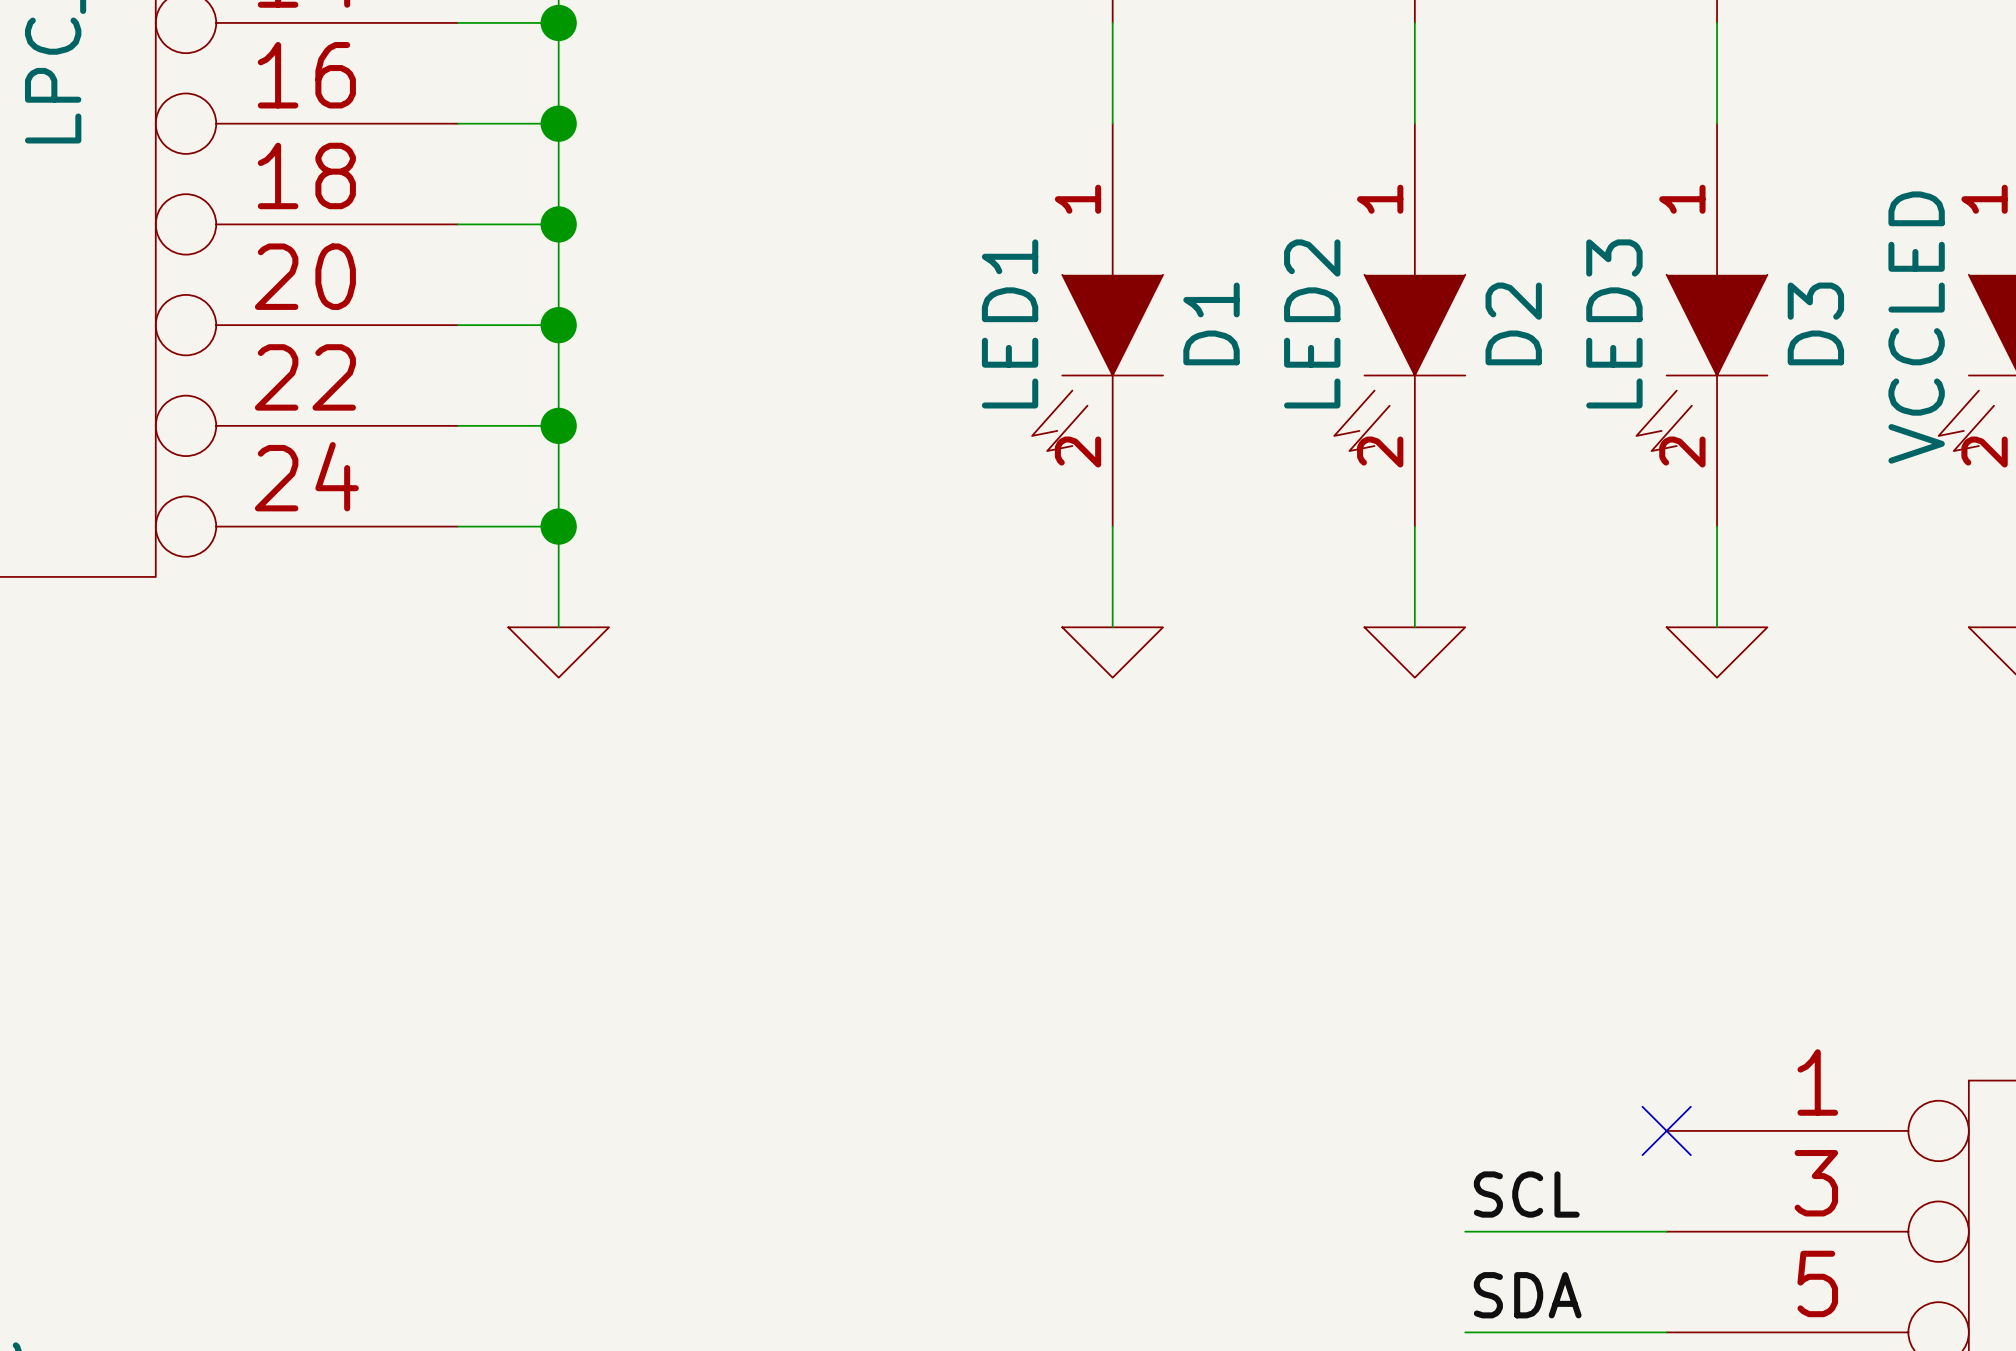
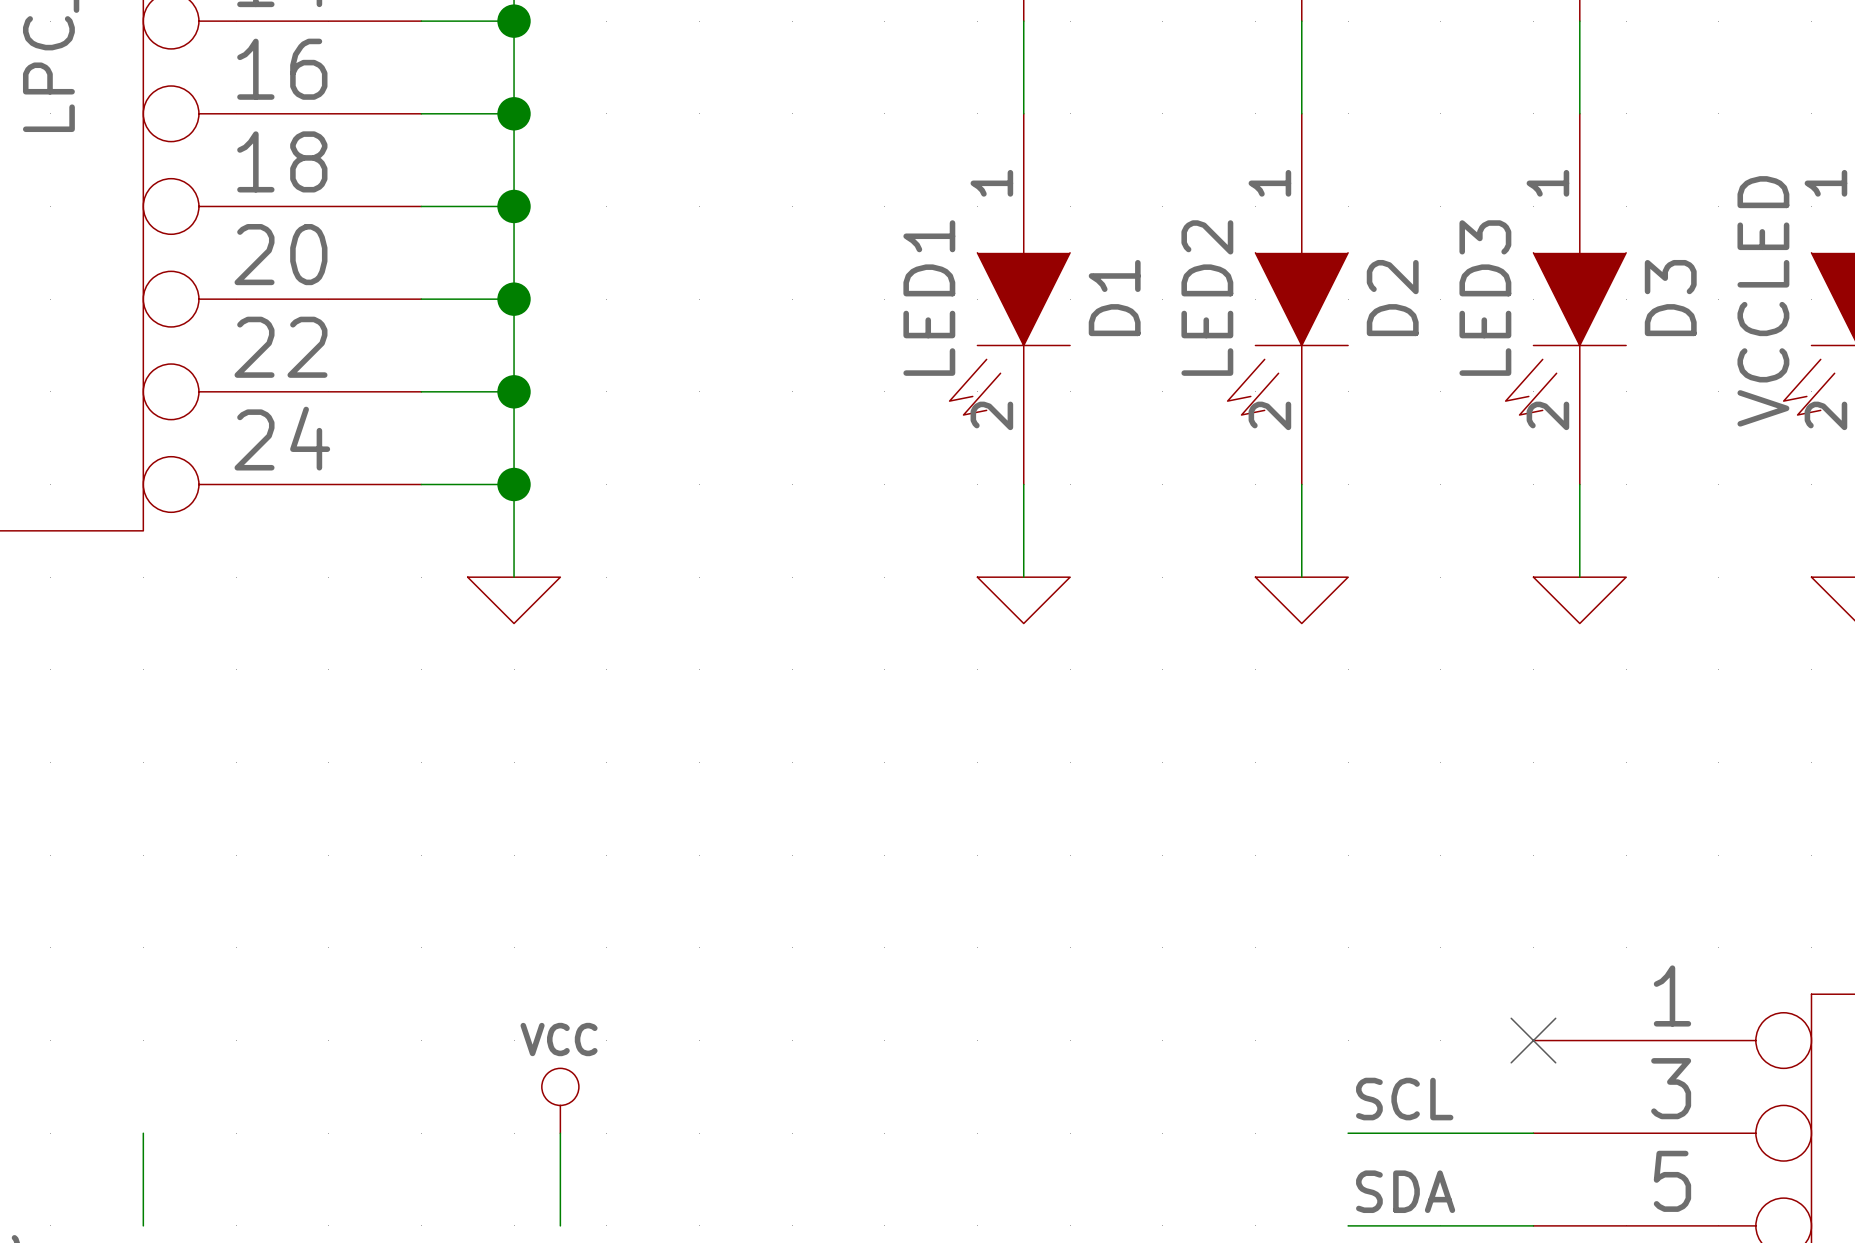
power symbol: none -> VCC (560, 1100)
wire: none -> (143, 1133) (143, 1225)
wire: none -> (560, 1133) (560, 1225)

